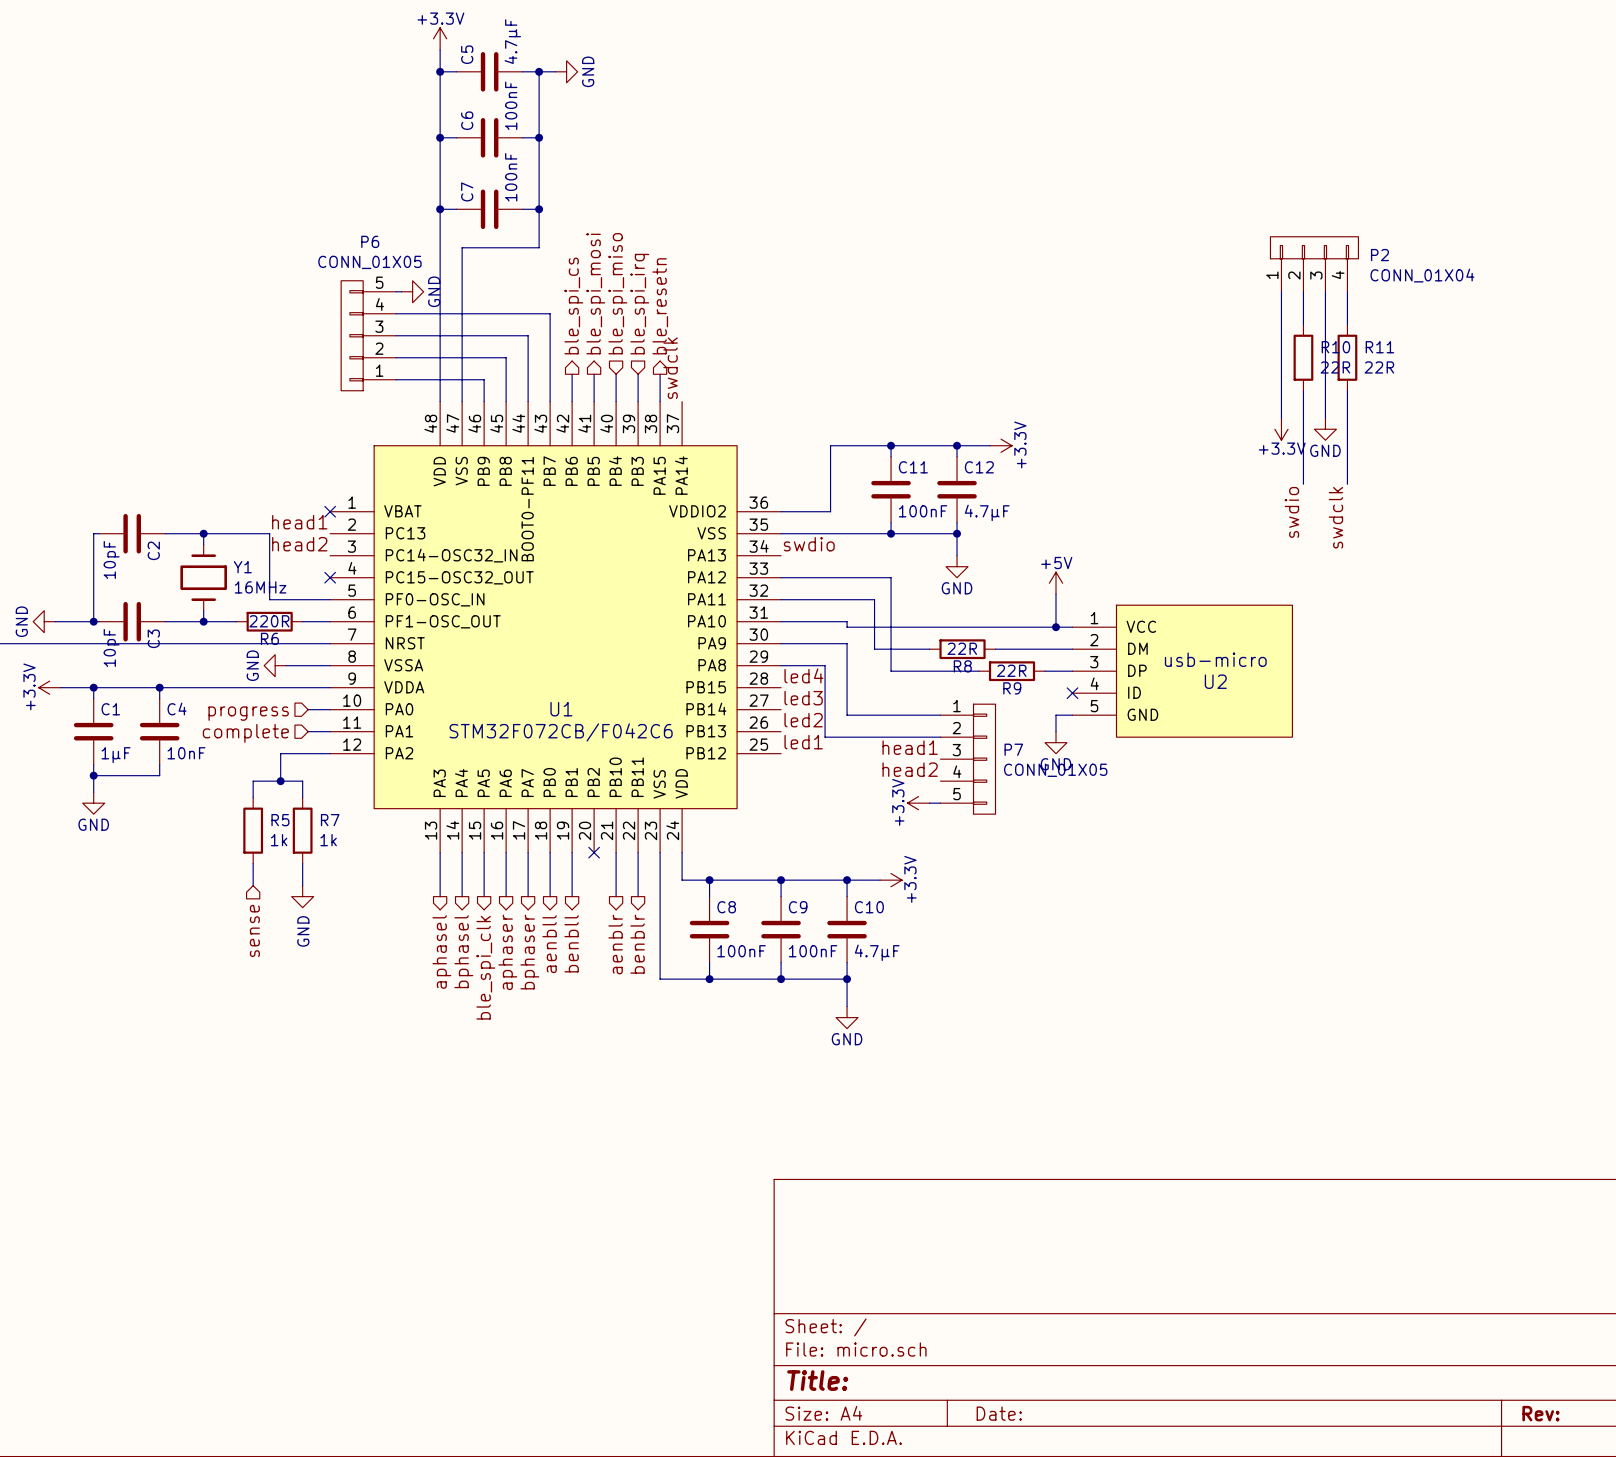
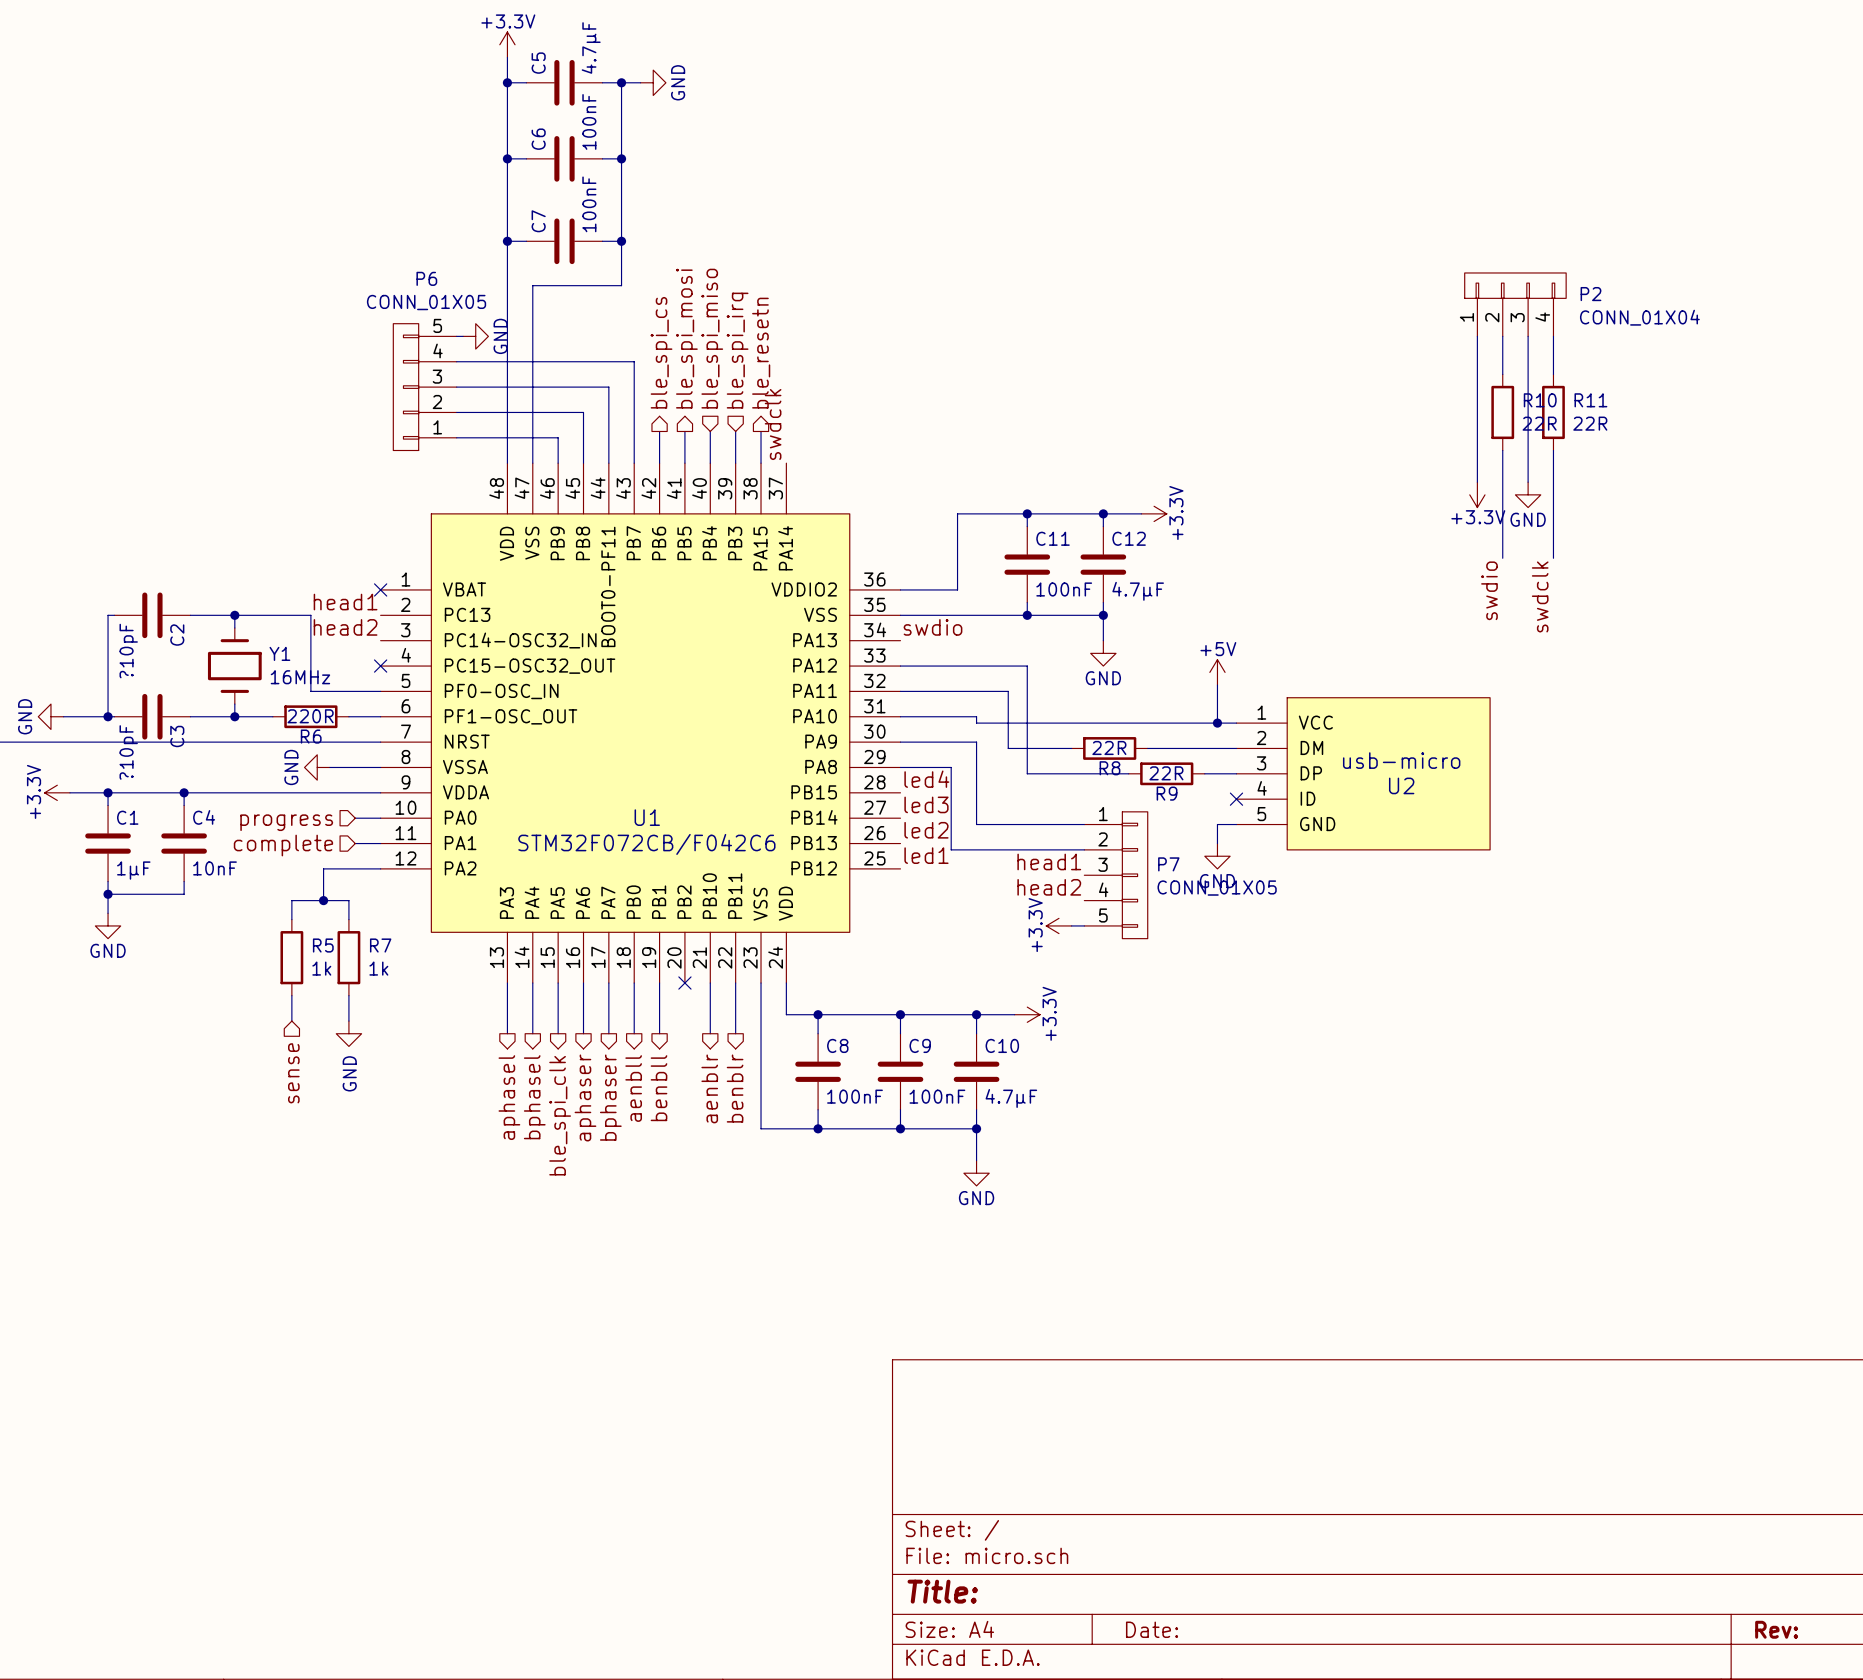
C2 value: 10pF (111, 559) -> ?10pF (128, 651)
C3 value: 10pF (111, 647) -> ?10pF (128, 752)

